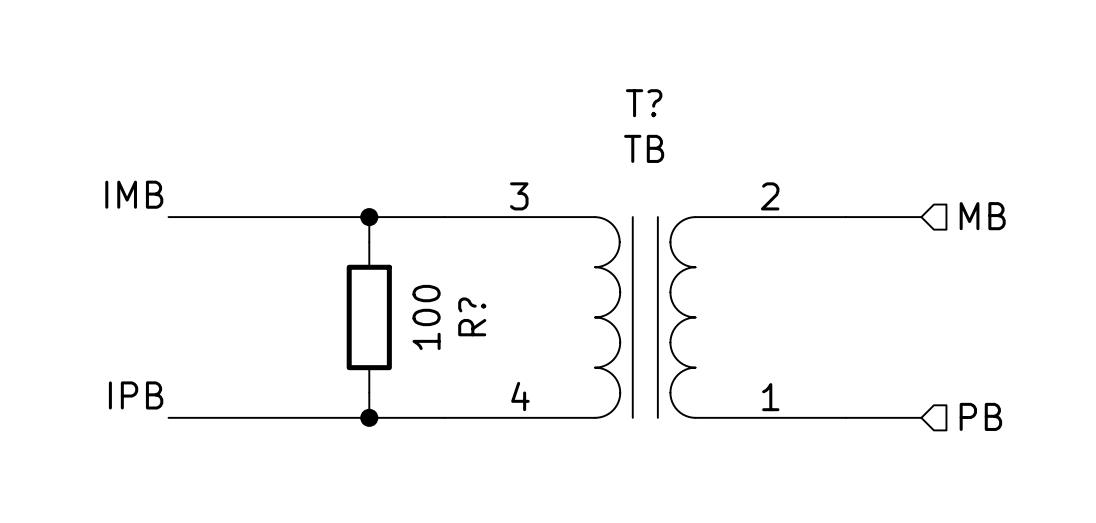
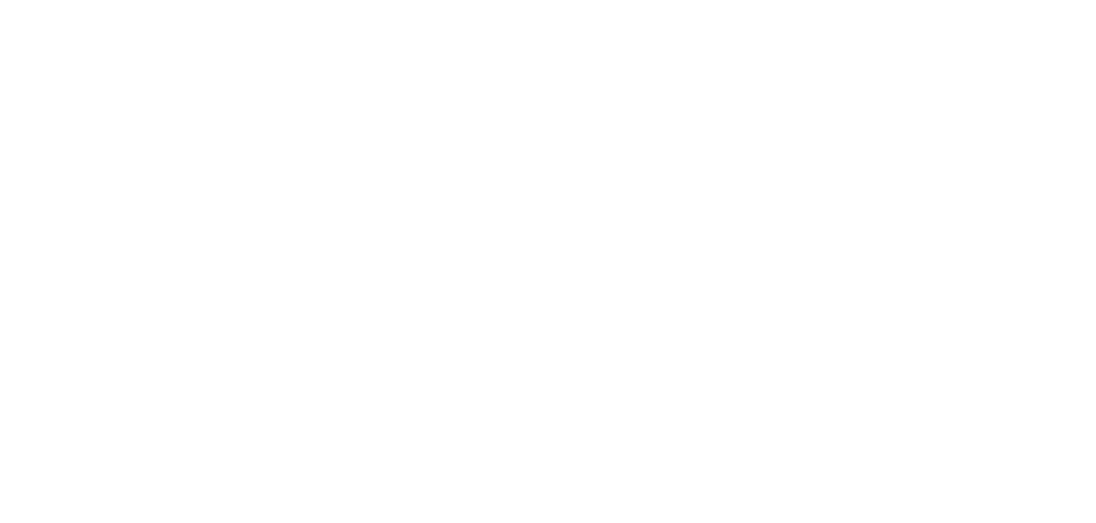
label: IMB (134, 194) -> none
hierarchical label: MB (982, 216) -> none
wire: (168, 217) (444, 217) -> none
wire: (369, 217) (369, 242) -> none
junction: (369, 217) -> none
wire: (846, 217) (921, 217) -> none
R?: 100 (369, 317) -> none
T?: TB (645, 317) -> none
wire: (369, 392) (369, 417) -> none
label: IPB (136, 395) -> none
hierarchical label: PB (980, 416) -> none
wire: (168, 417) (444, 417) -> none
junction: (369, 417) -> none
wire: (846, 417) (921, 417) -> none

